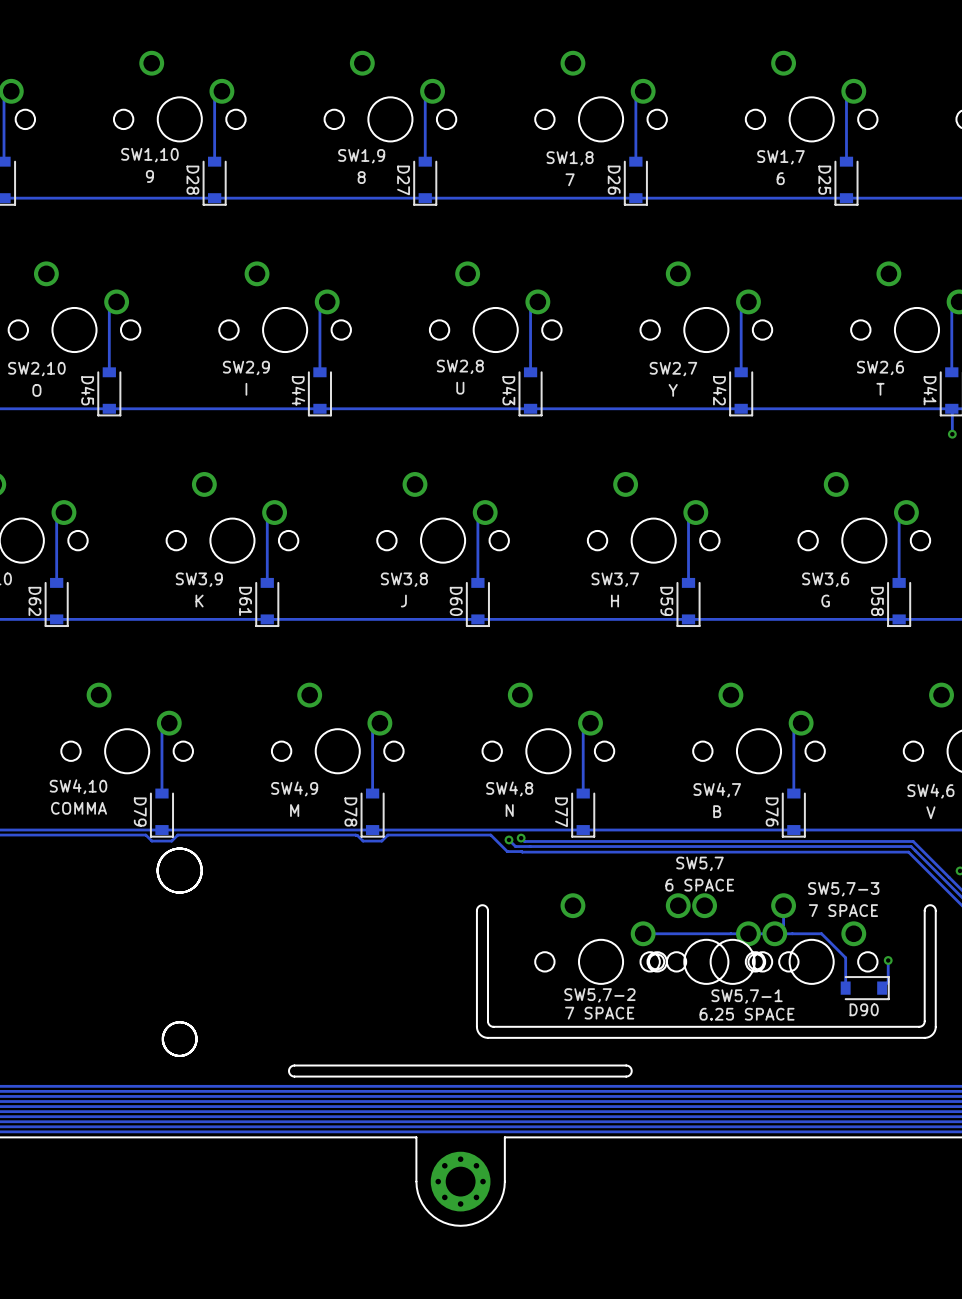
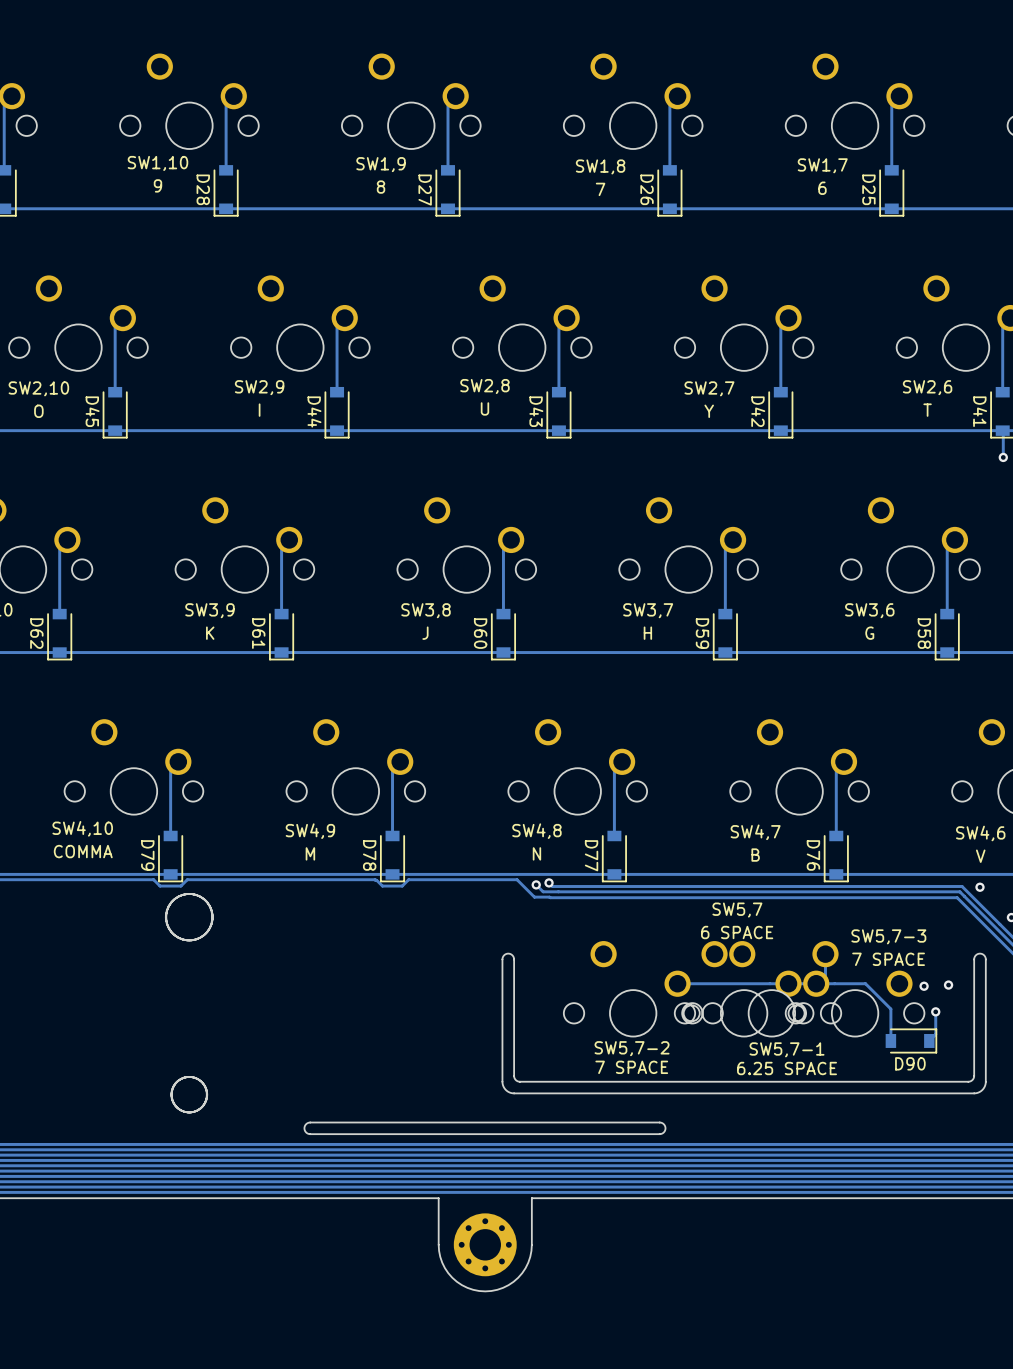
via: none -> (980, 887)
via: none -> (948, 985)
via: none -> (924, 986)

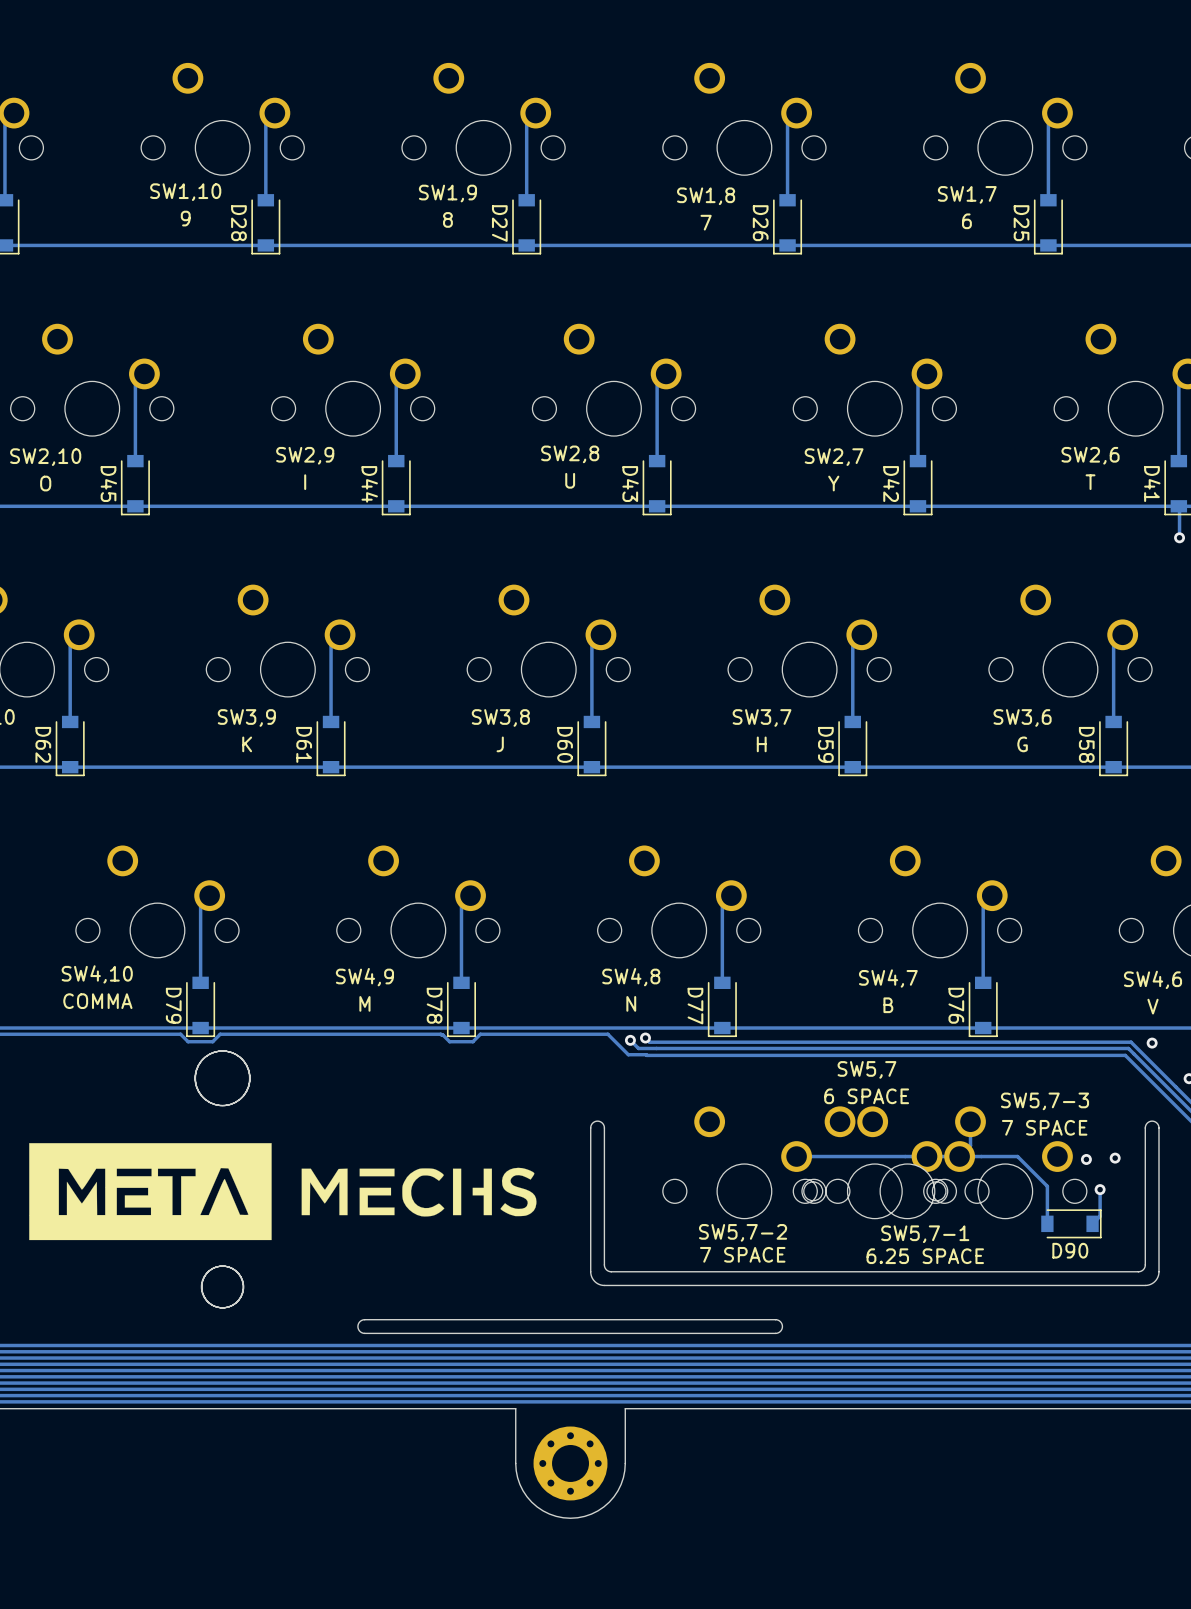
drawing: none -> [29, 1143, 537, 1241]

